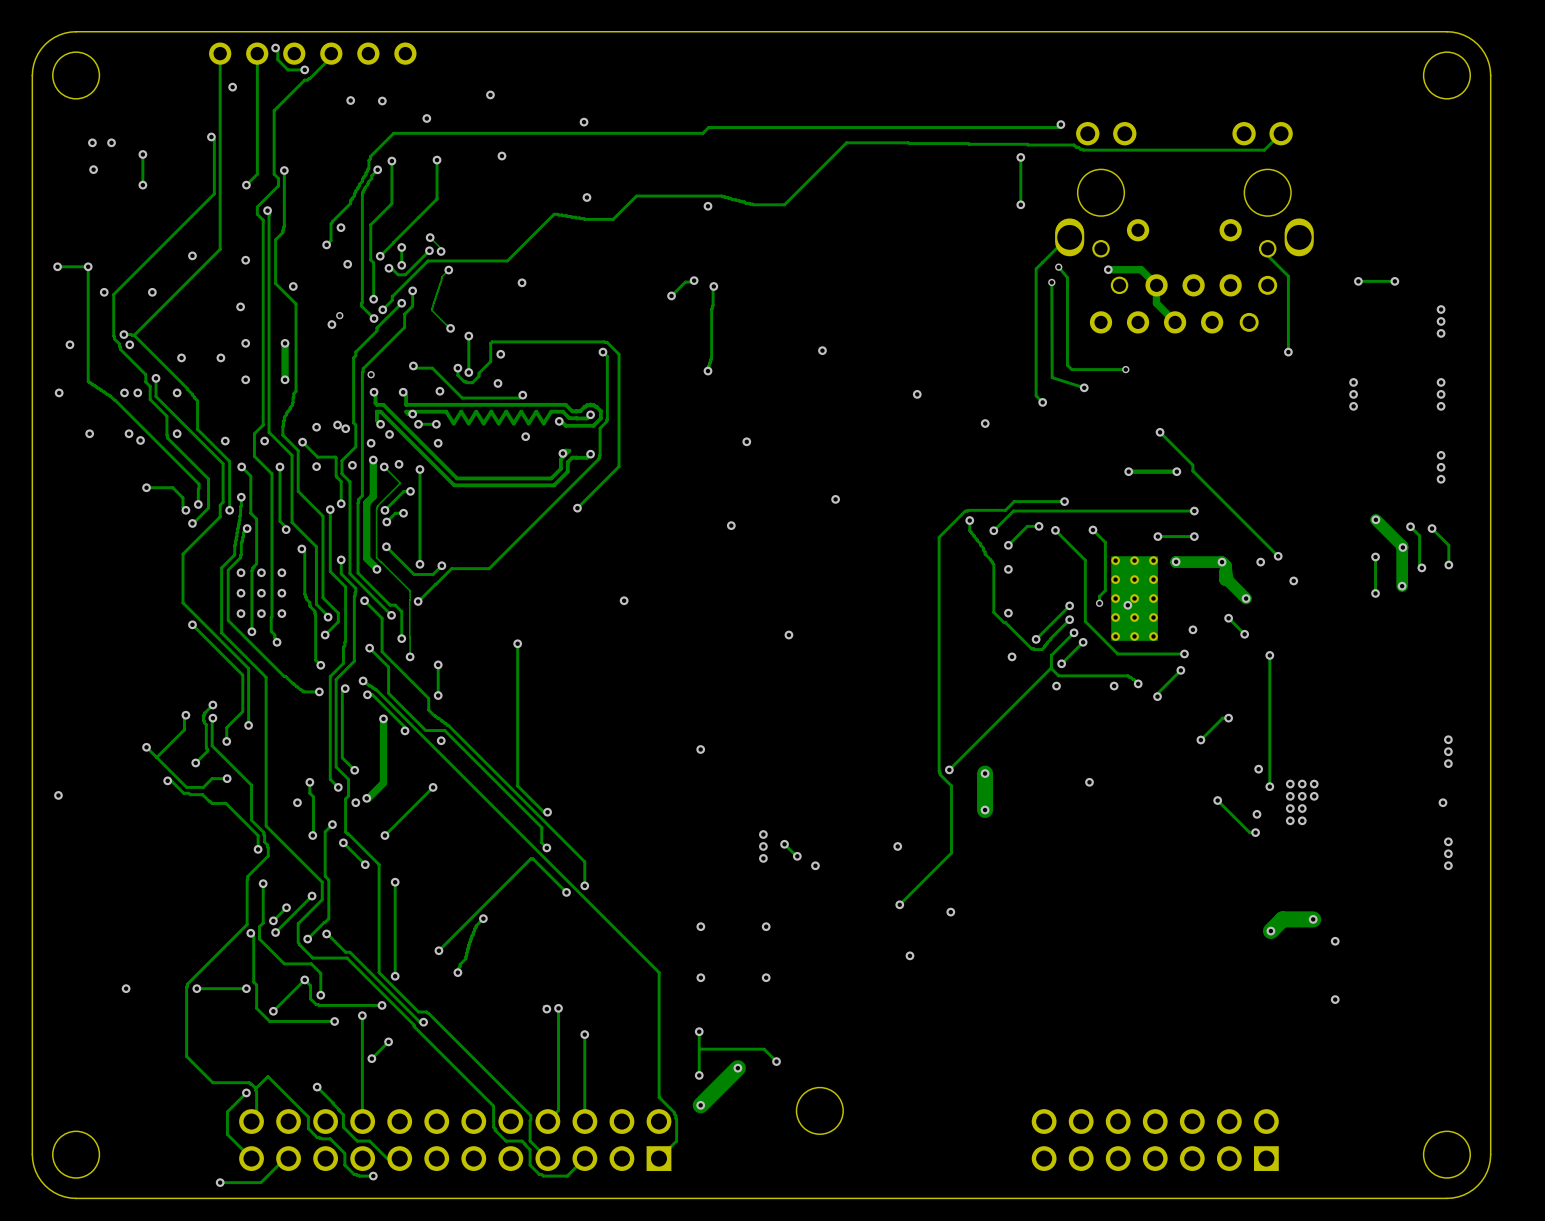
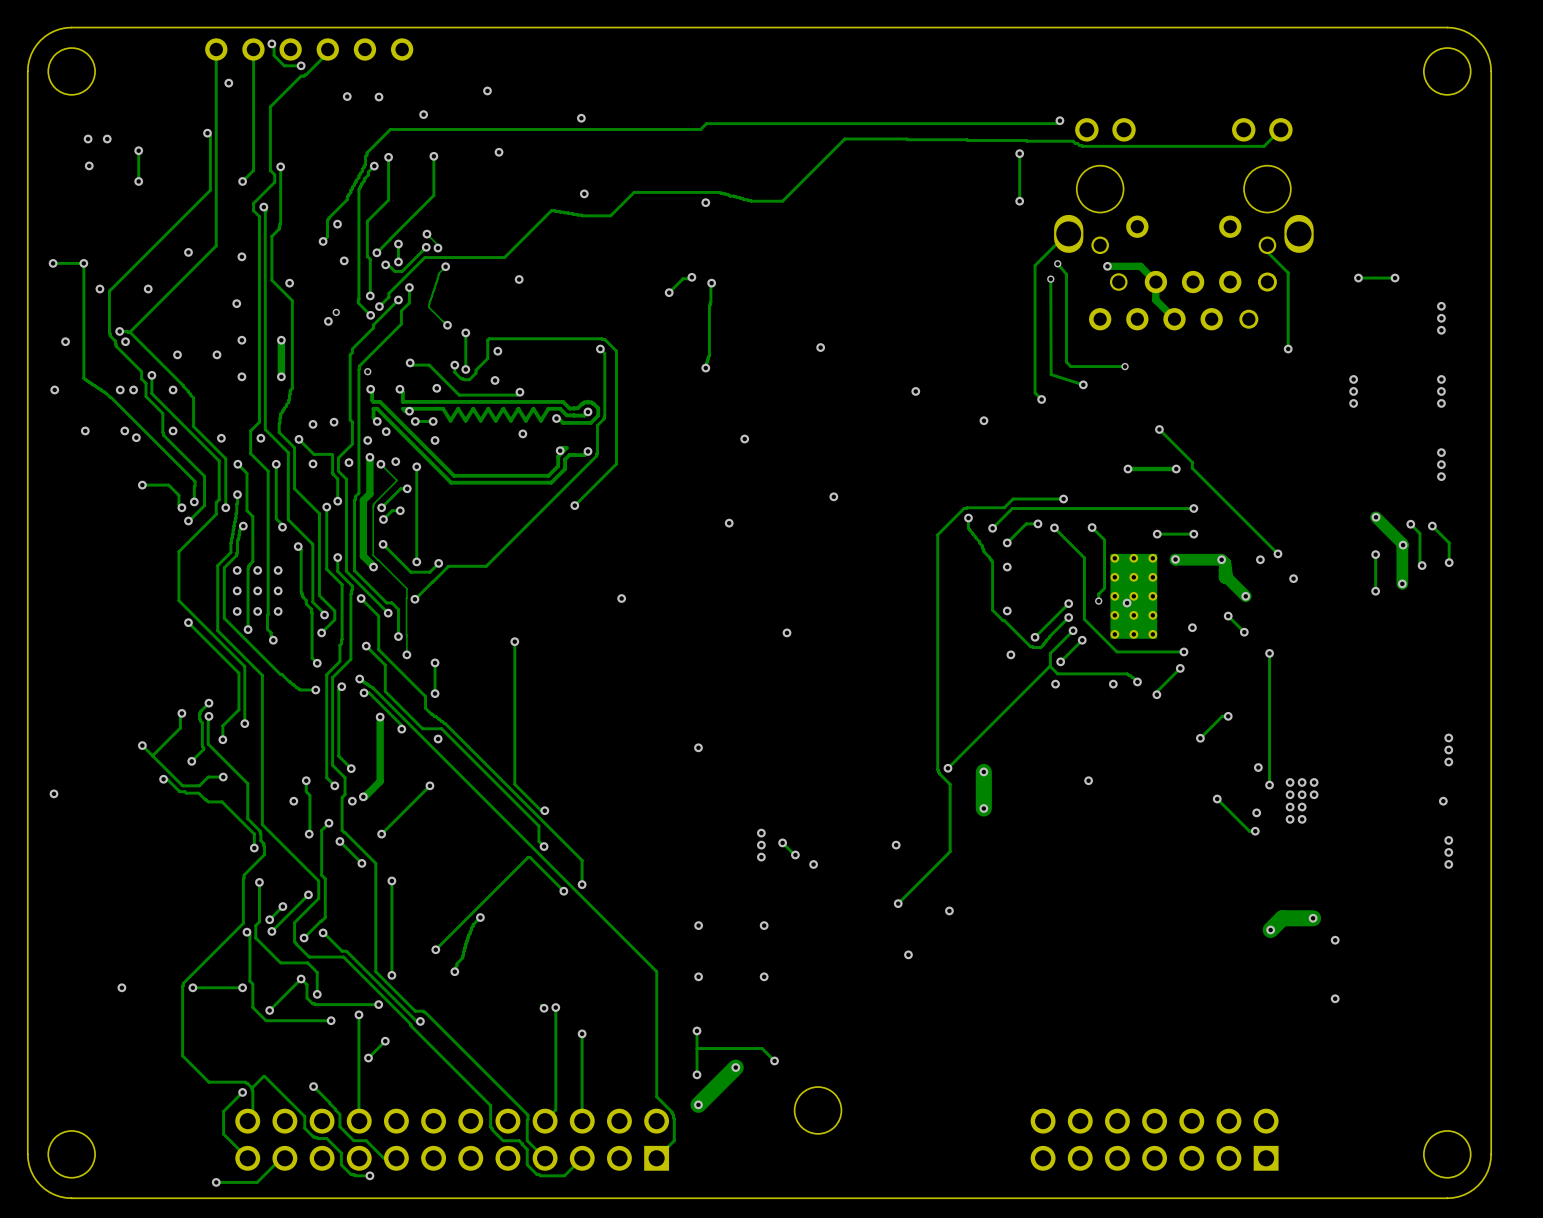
via: (345, 428) -> none

